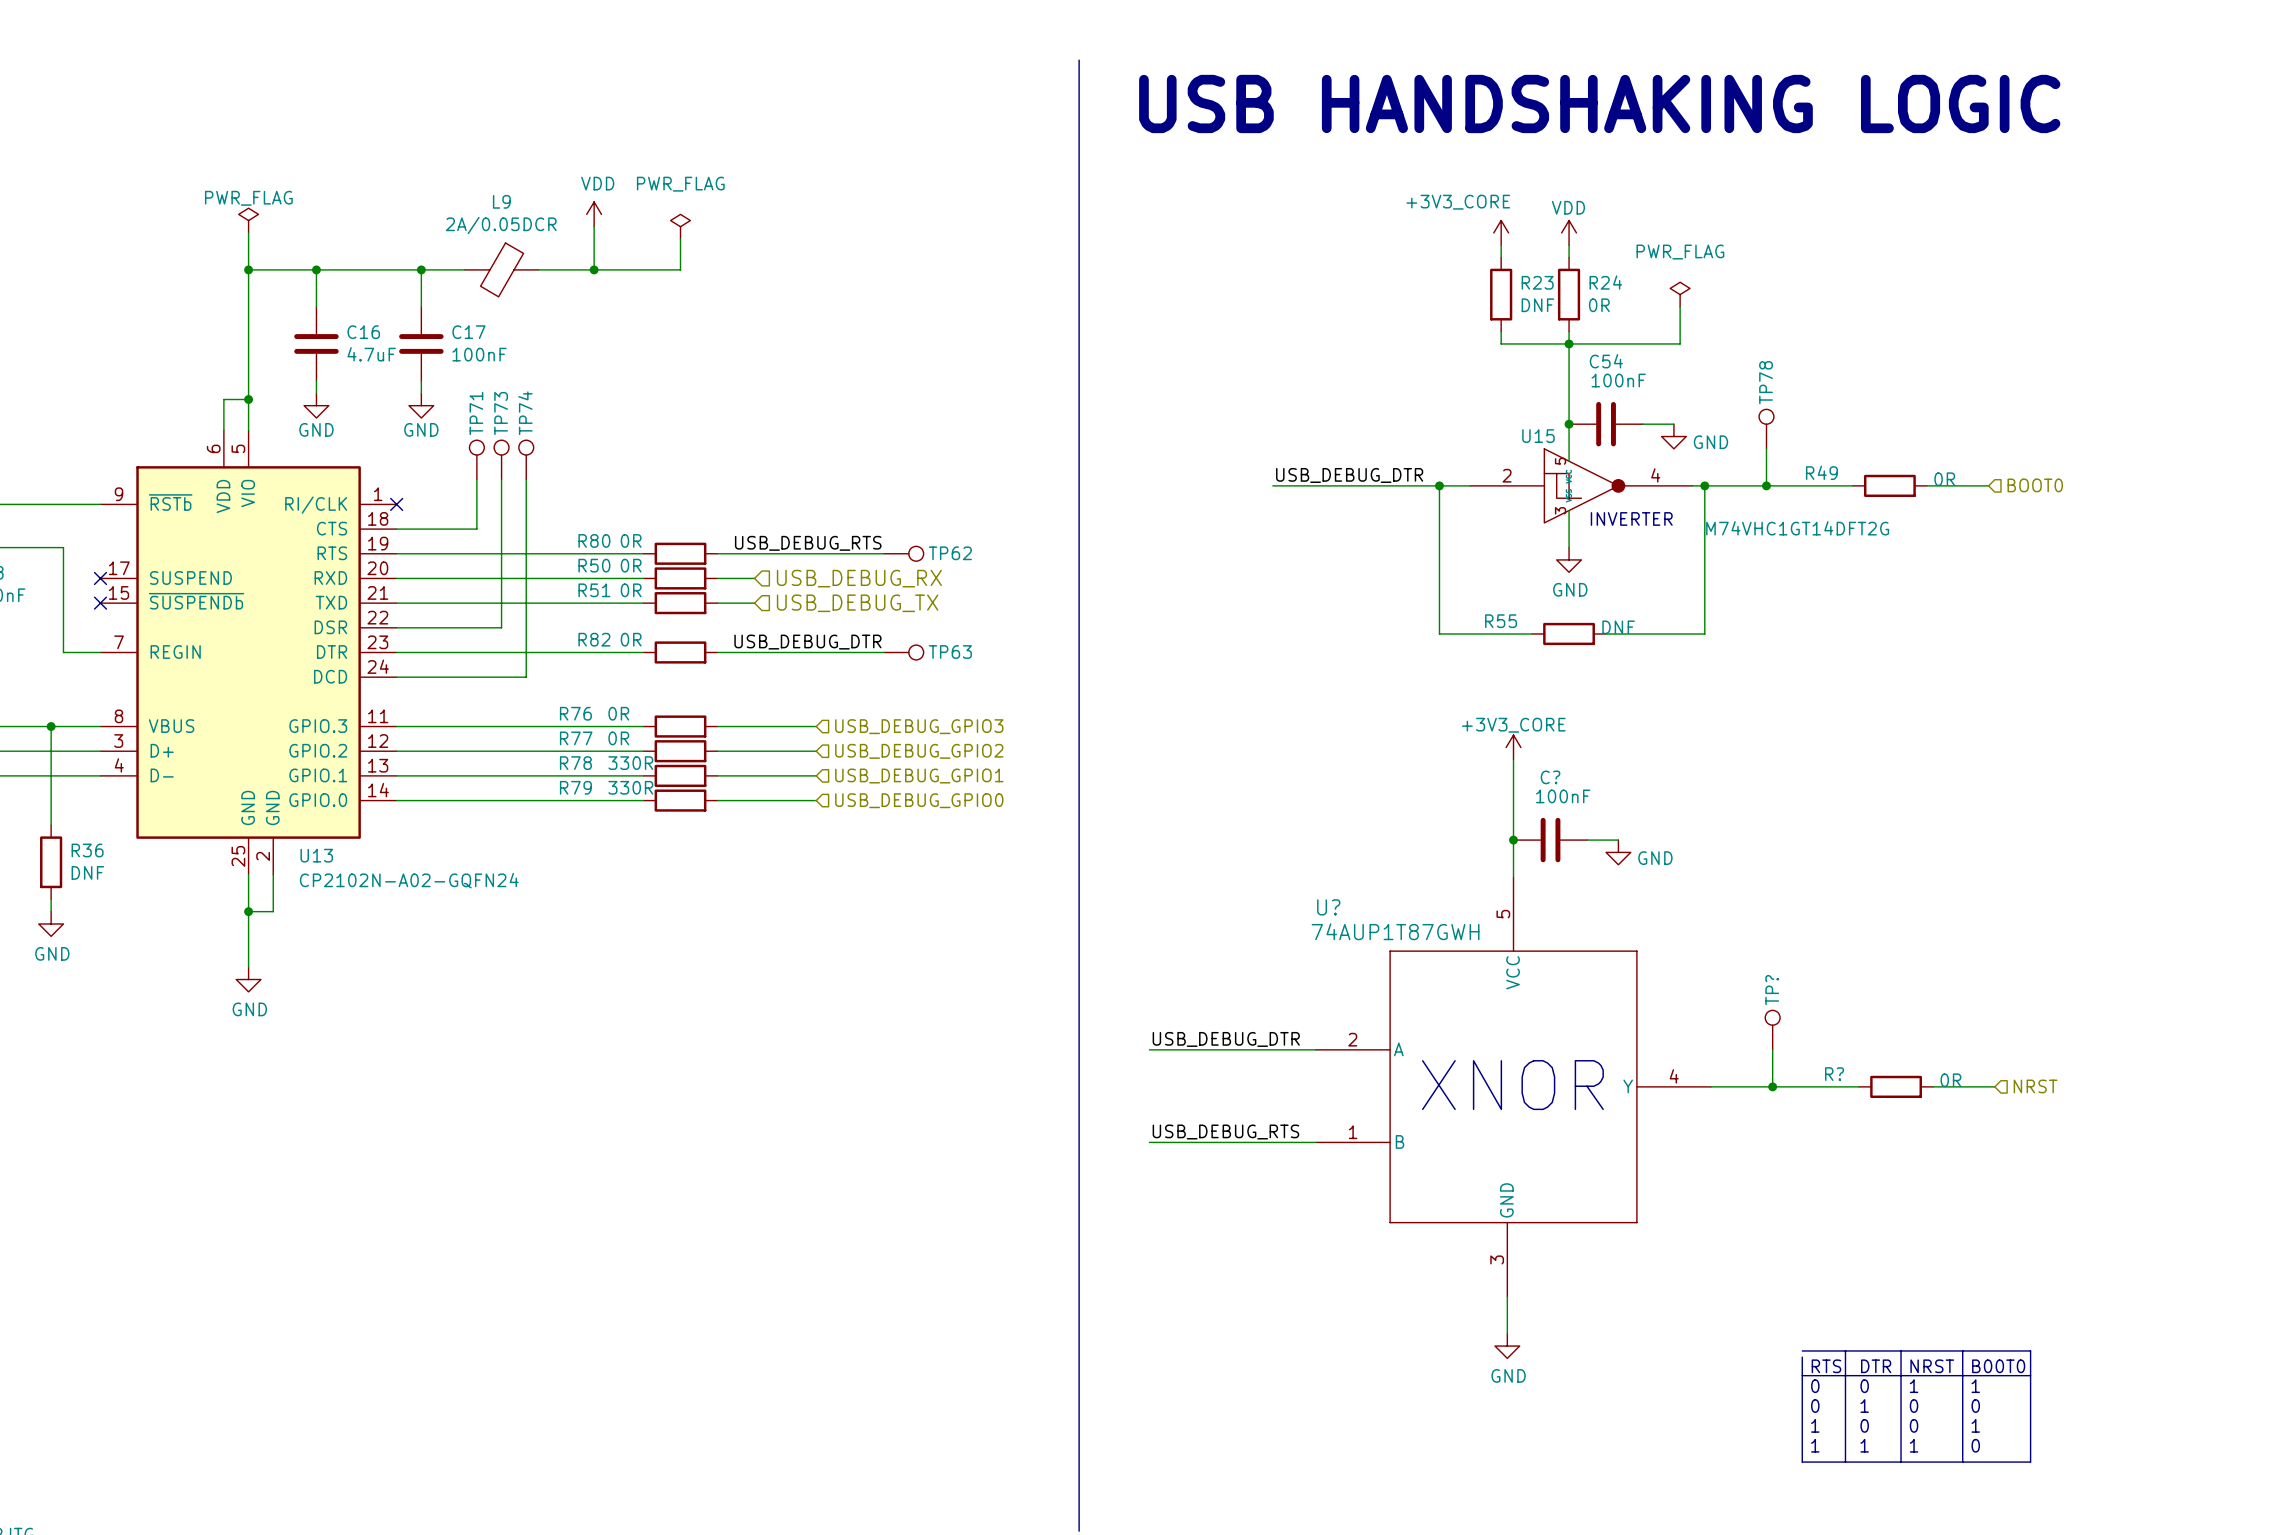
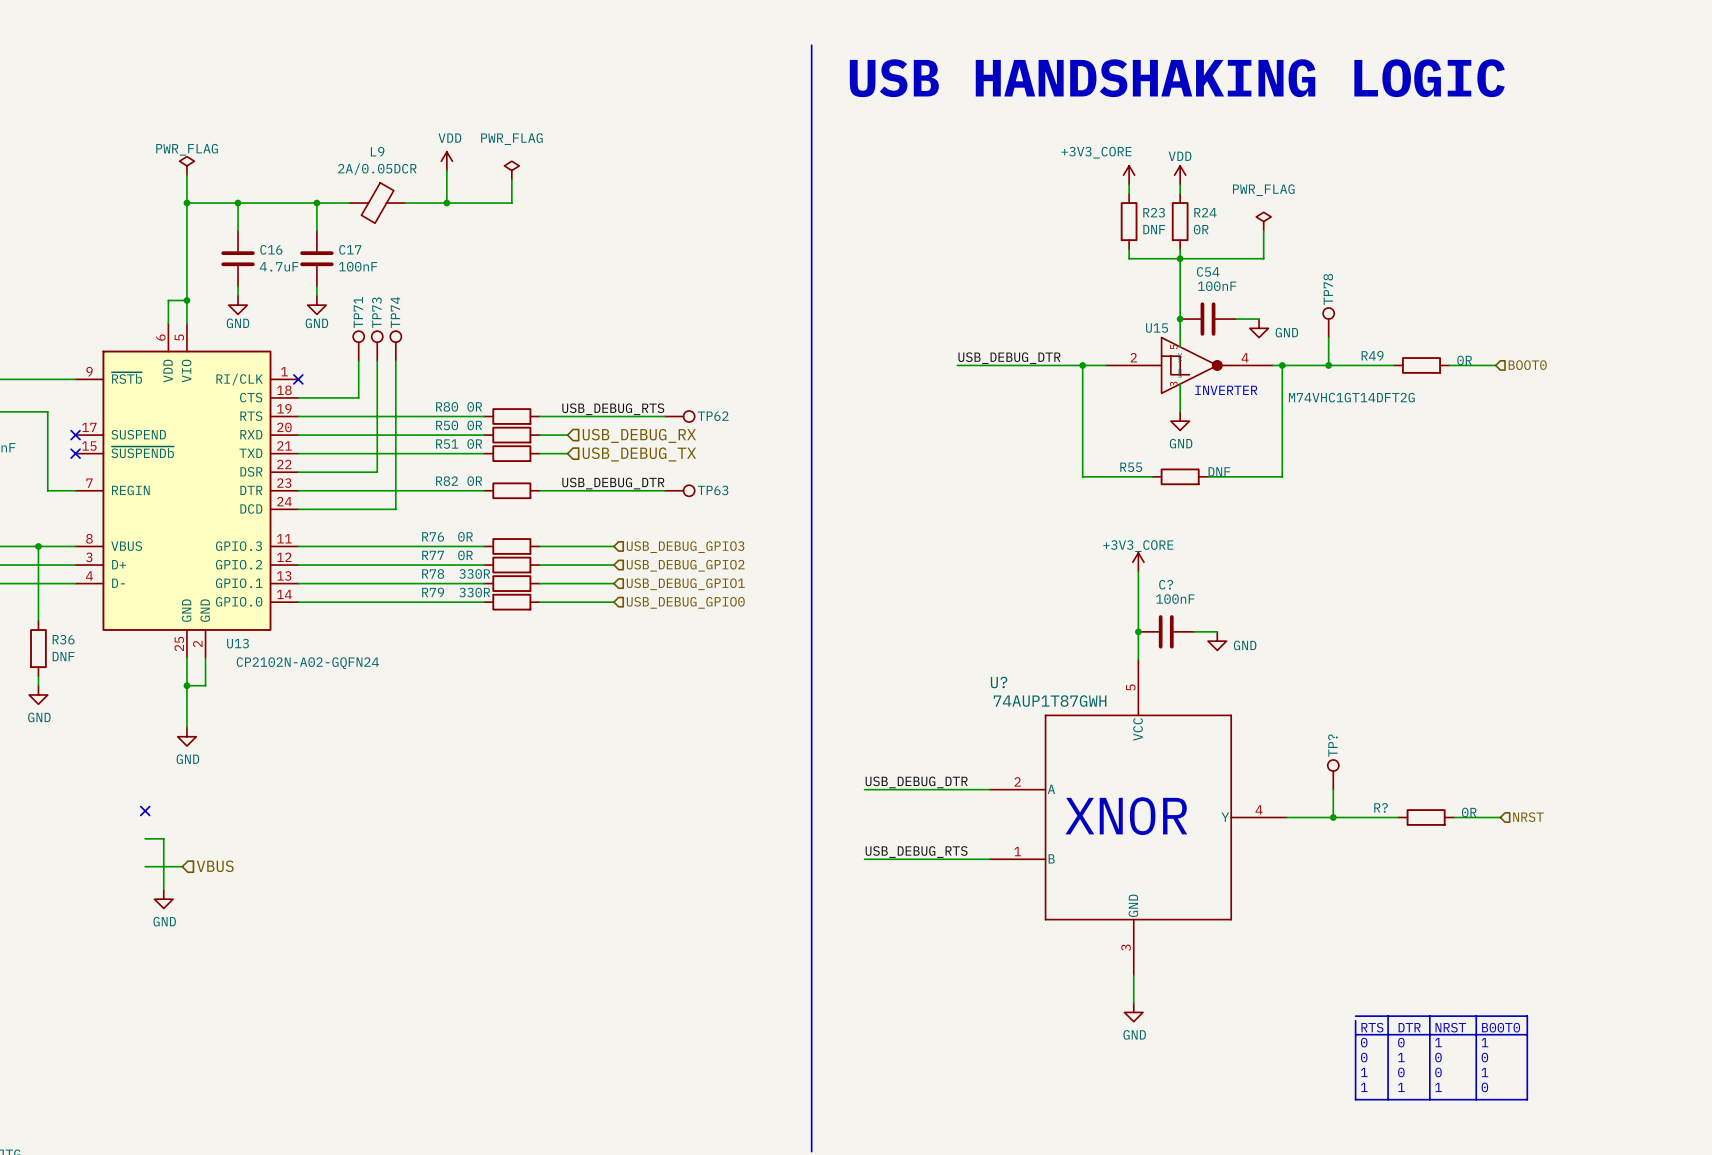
no-connect mark: none -> (145, 811)
wire: none -> (145, 838) (163, 838) (163, 889)
hierarchical label: none -> VBUS (215, 866)
wire: none -> (145, 866) (182, 866)
power symbol: none -> GND (163, 899)

